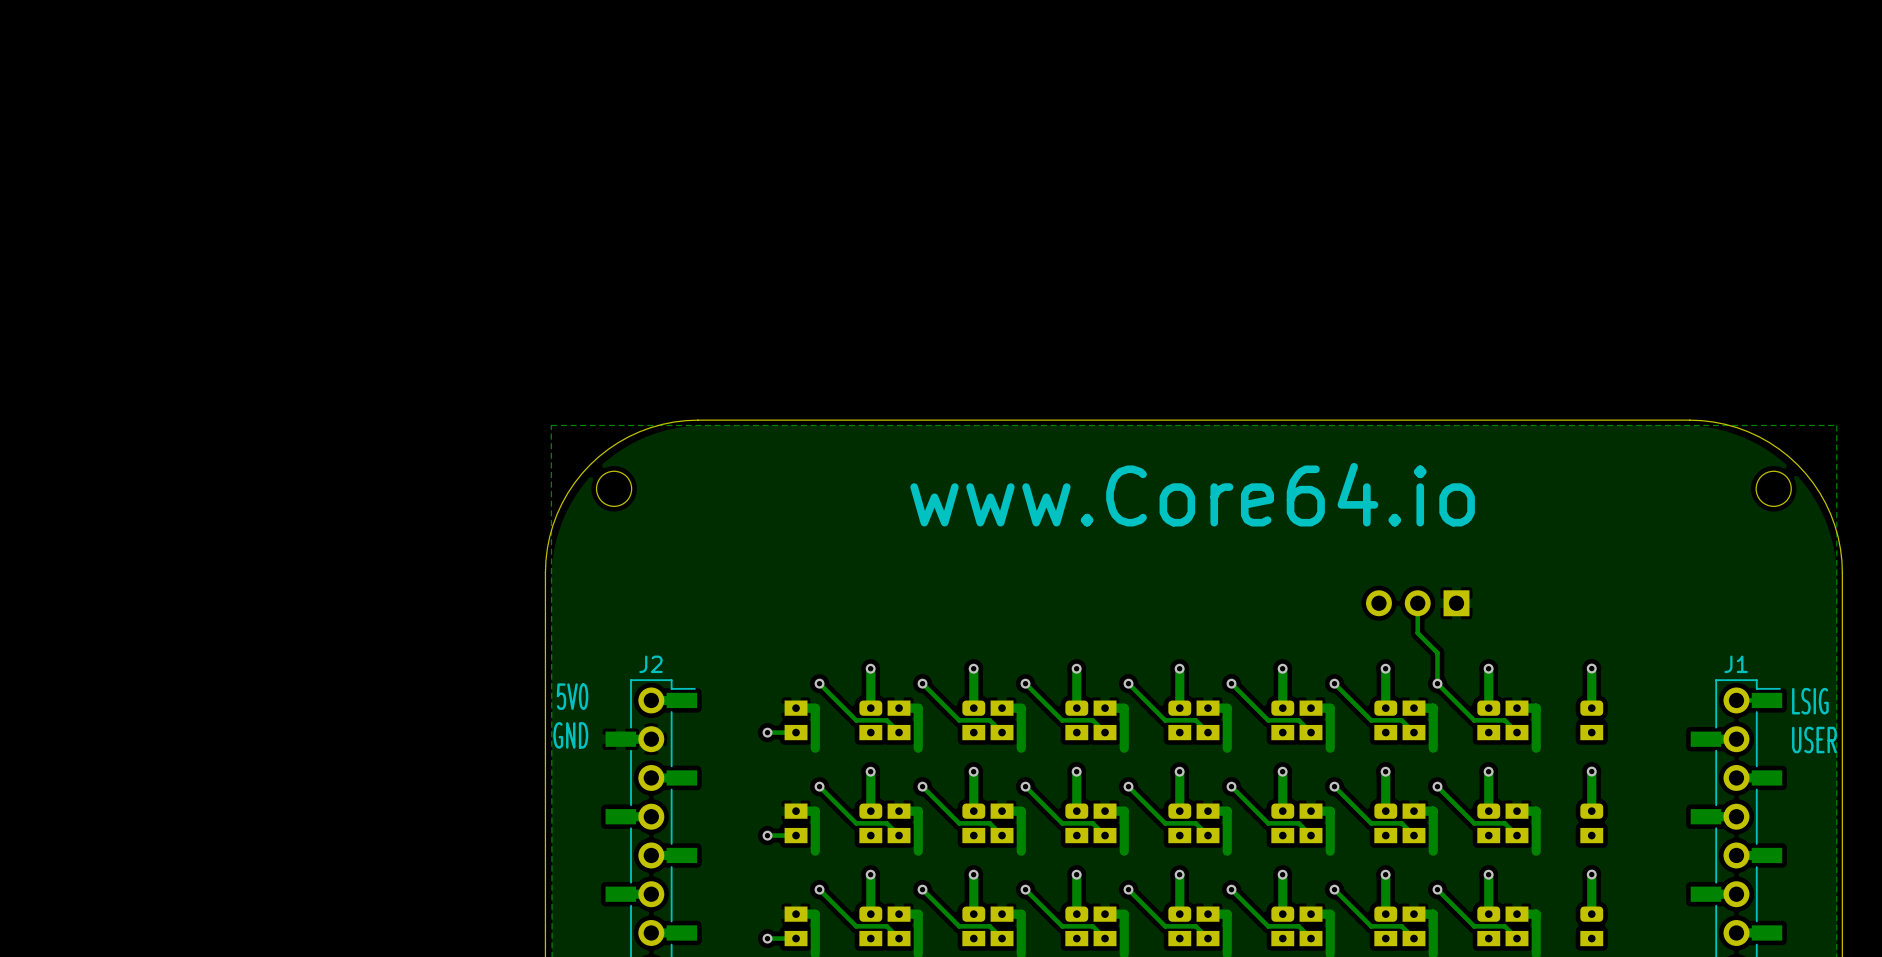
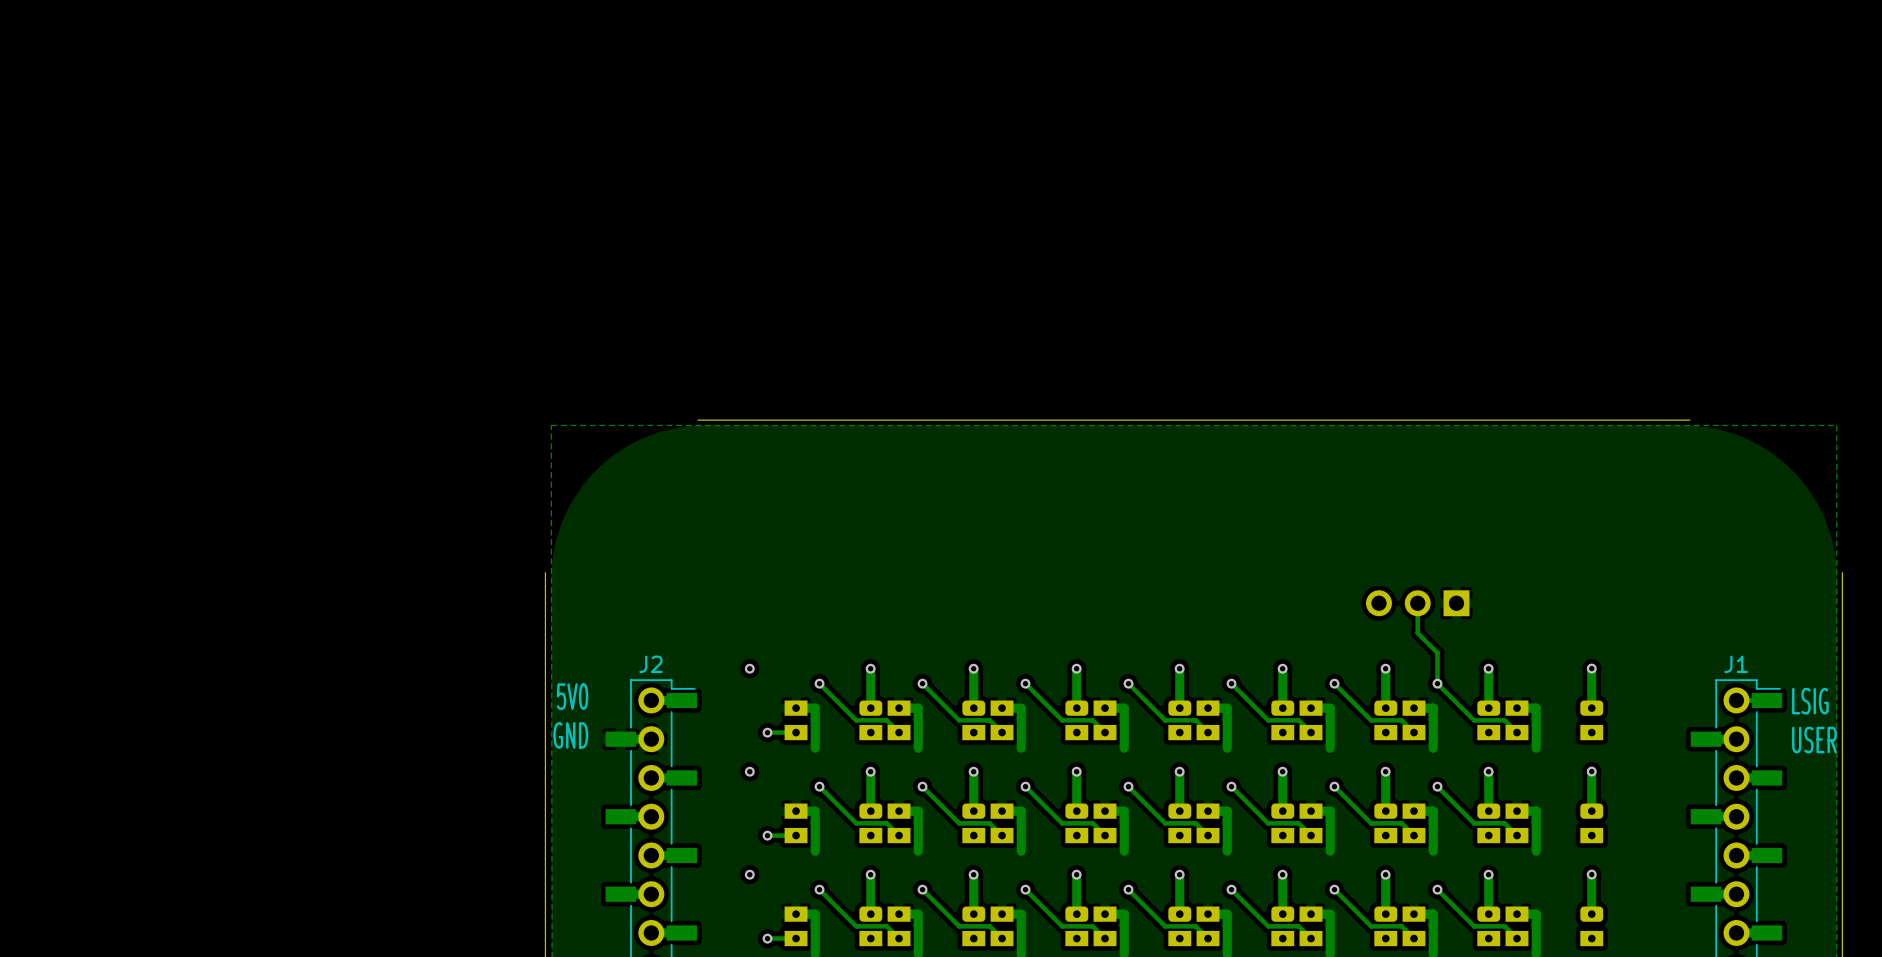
board edge: (698, 420) (674, 422) (639, 431) (608, 449) (590, 464) (574, 483) (557, 514) (547, 548) (545, 572) -> none
board edge: (1689, 420) (1713, 422) (1748, 431) (1779, 449) (1797, 464) (1813, 483) (1830, 514) (1840, 548) (1842, 572) -> none
round board edge: [596, 470, 633, 507] -> none
round board edge: [1755, 470, 1792, 507] -> none
text: www.Core64.io (1192, 494) -> none
via: none -> (749, 668)
via: none -> (749, 771)
via: none -> (749, 874)

